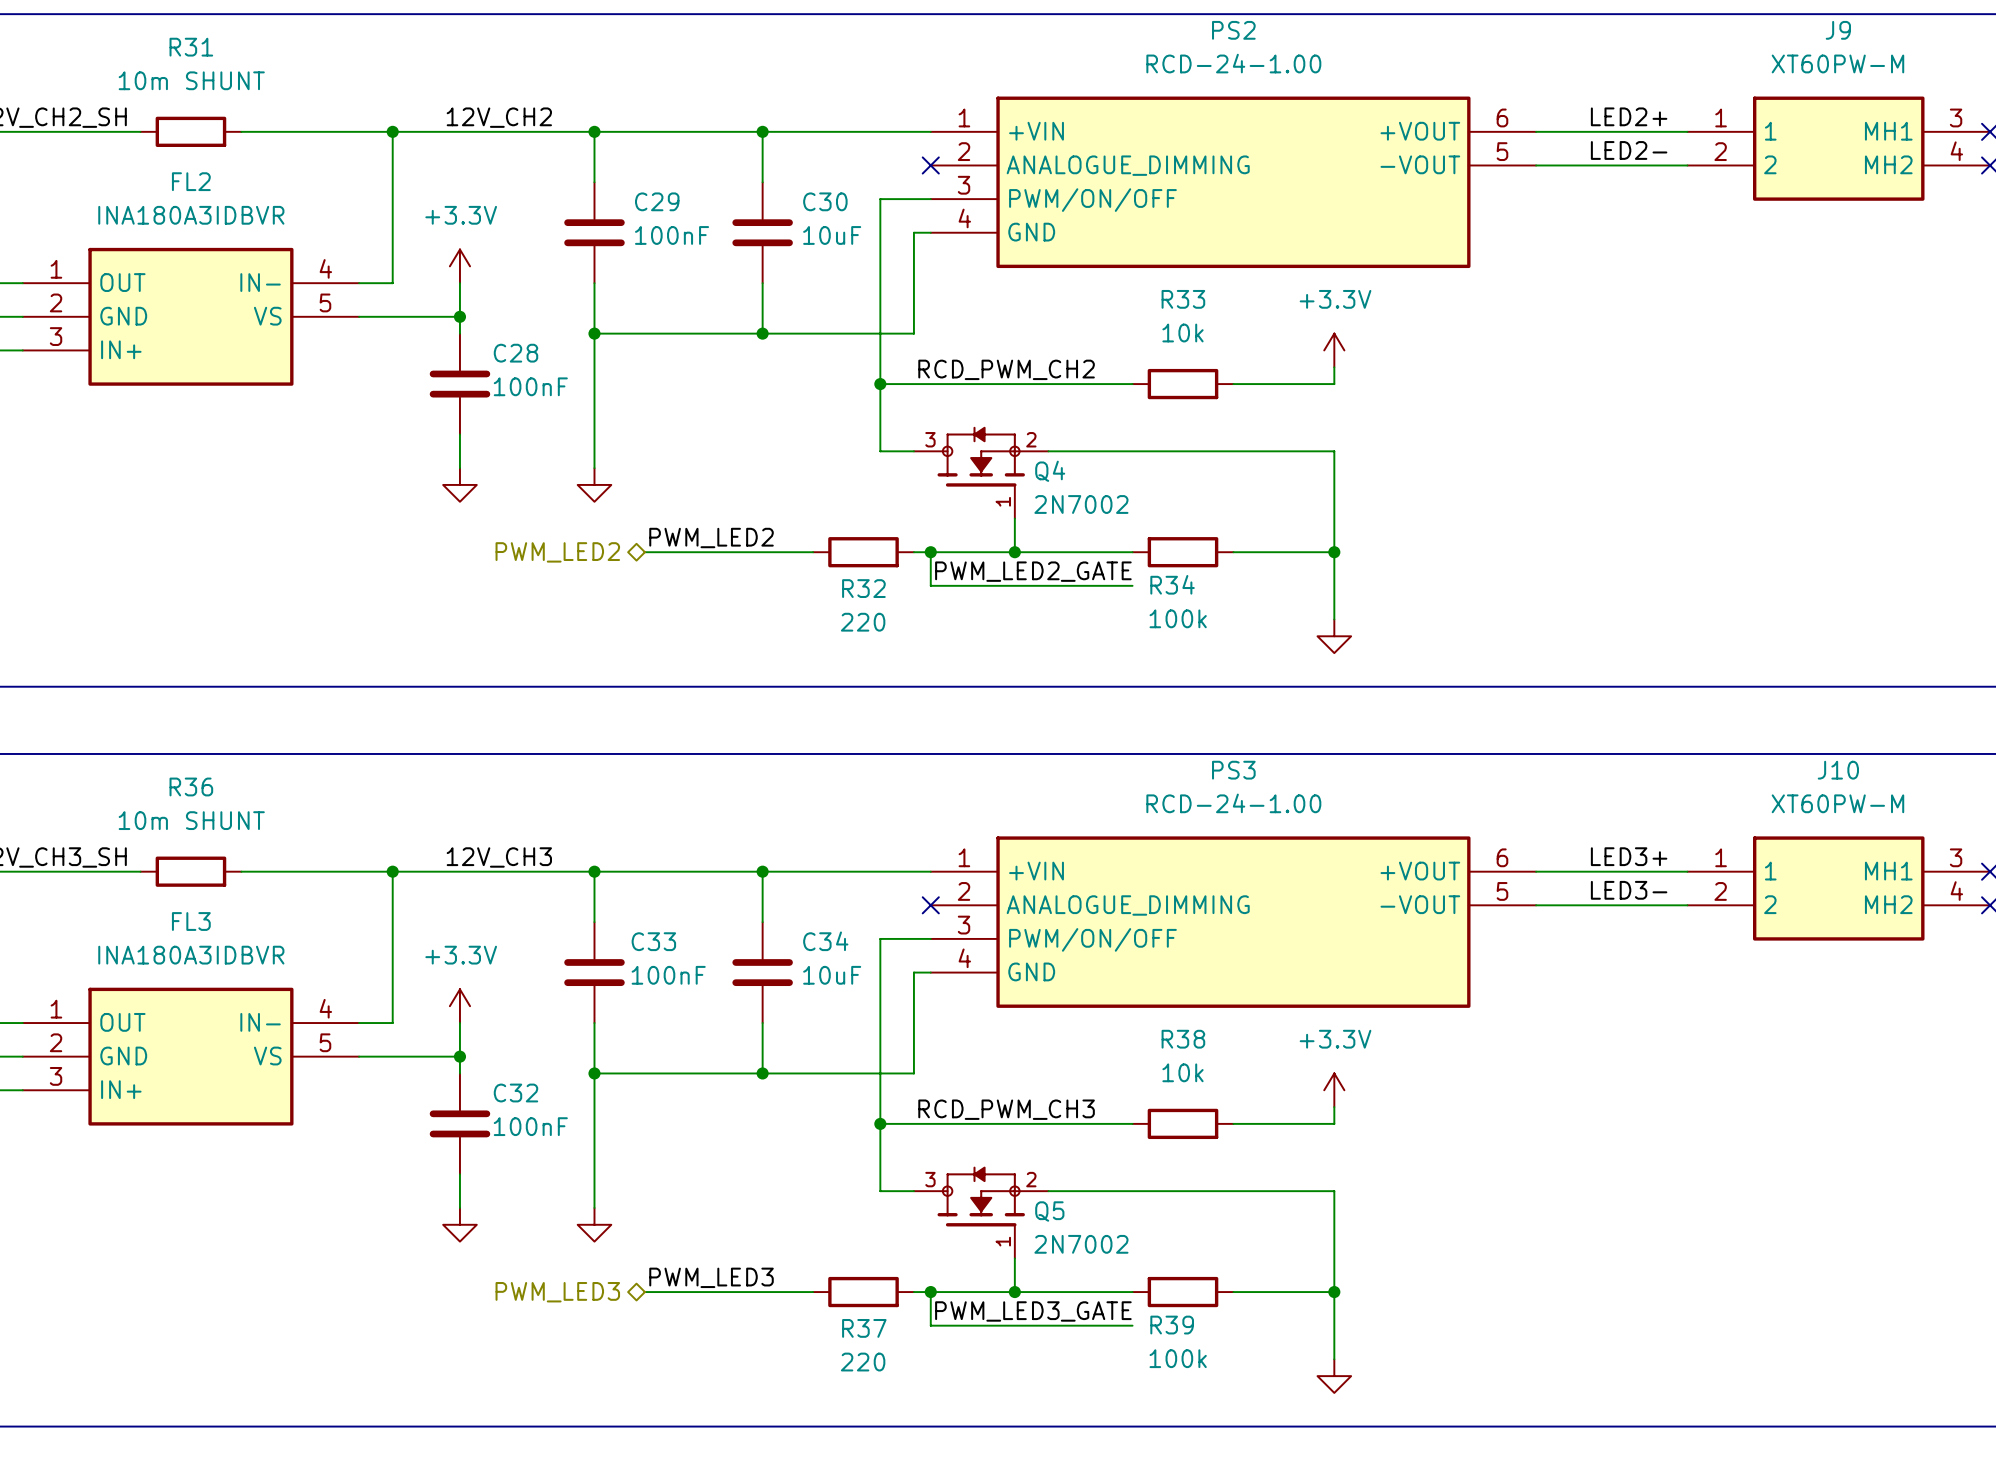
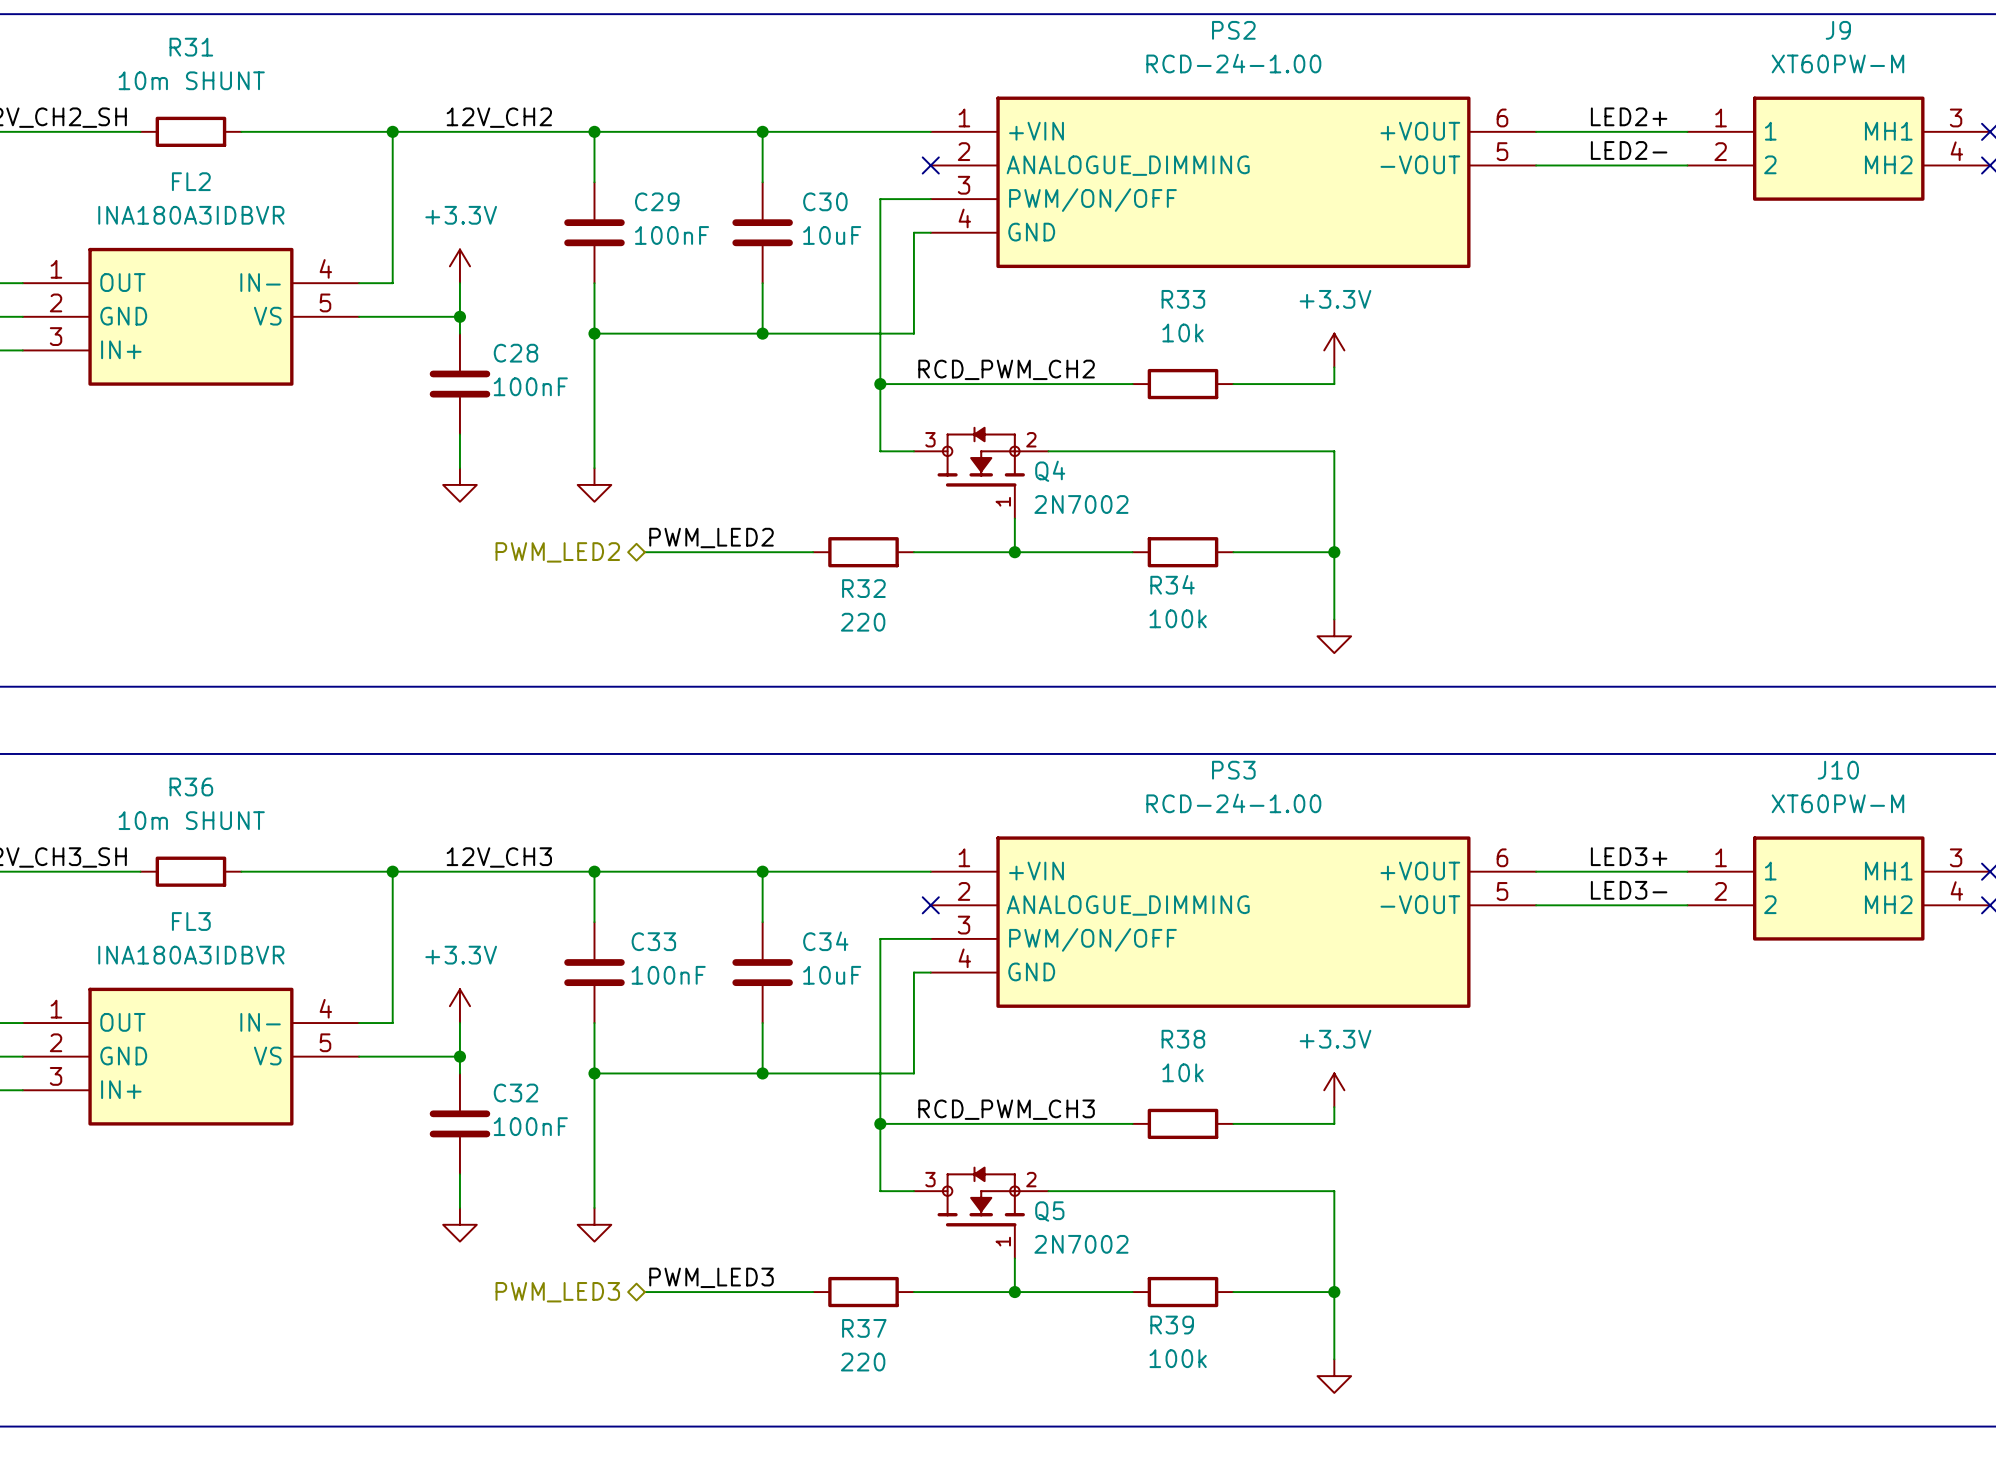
wire: (930, 552) (930, 585) (1132, 585) -> none
junction: (930, 552) -> none
label: PWM_LED2_GATE (1033, 571) -> none
wire: (930, 1292) (930, 1325) (1132, 1325) -> none
junction: (930, 1292) -> none
label: PWM_LED3_GATE (1033, 1311) -> none

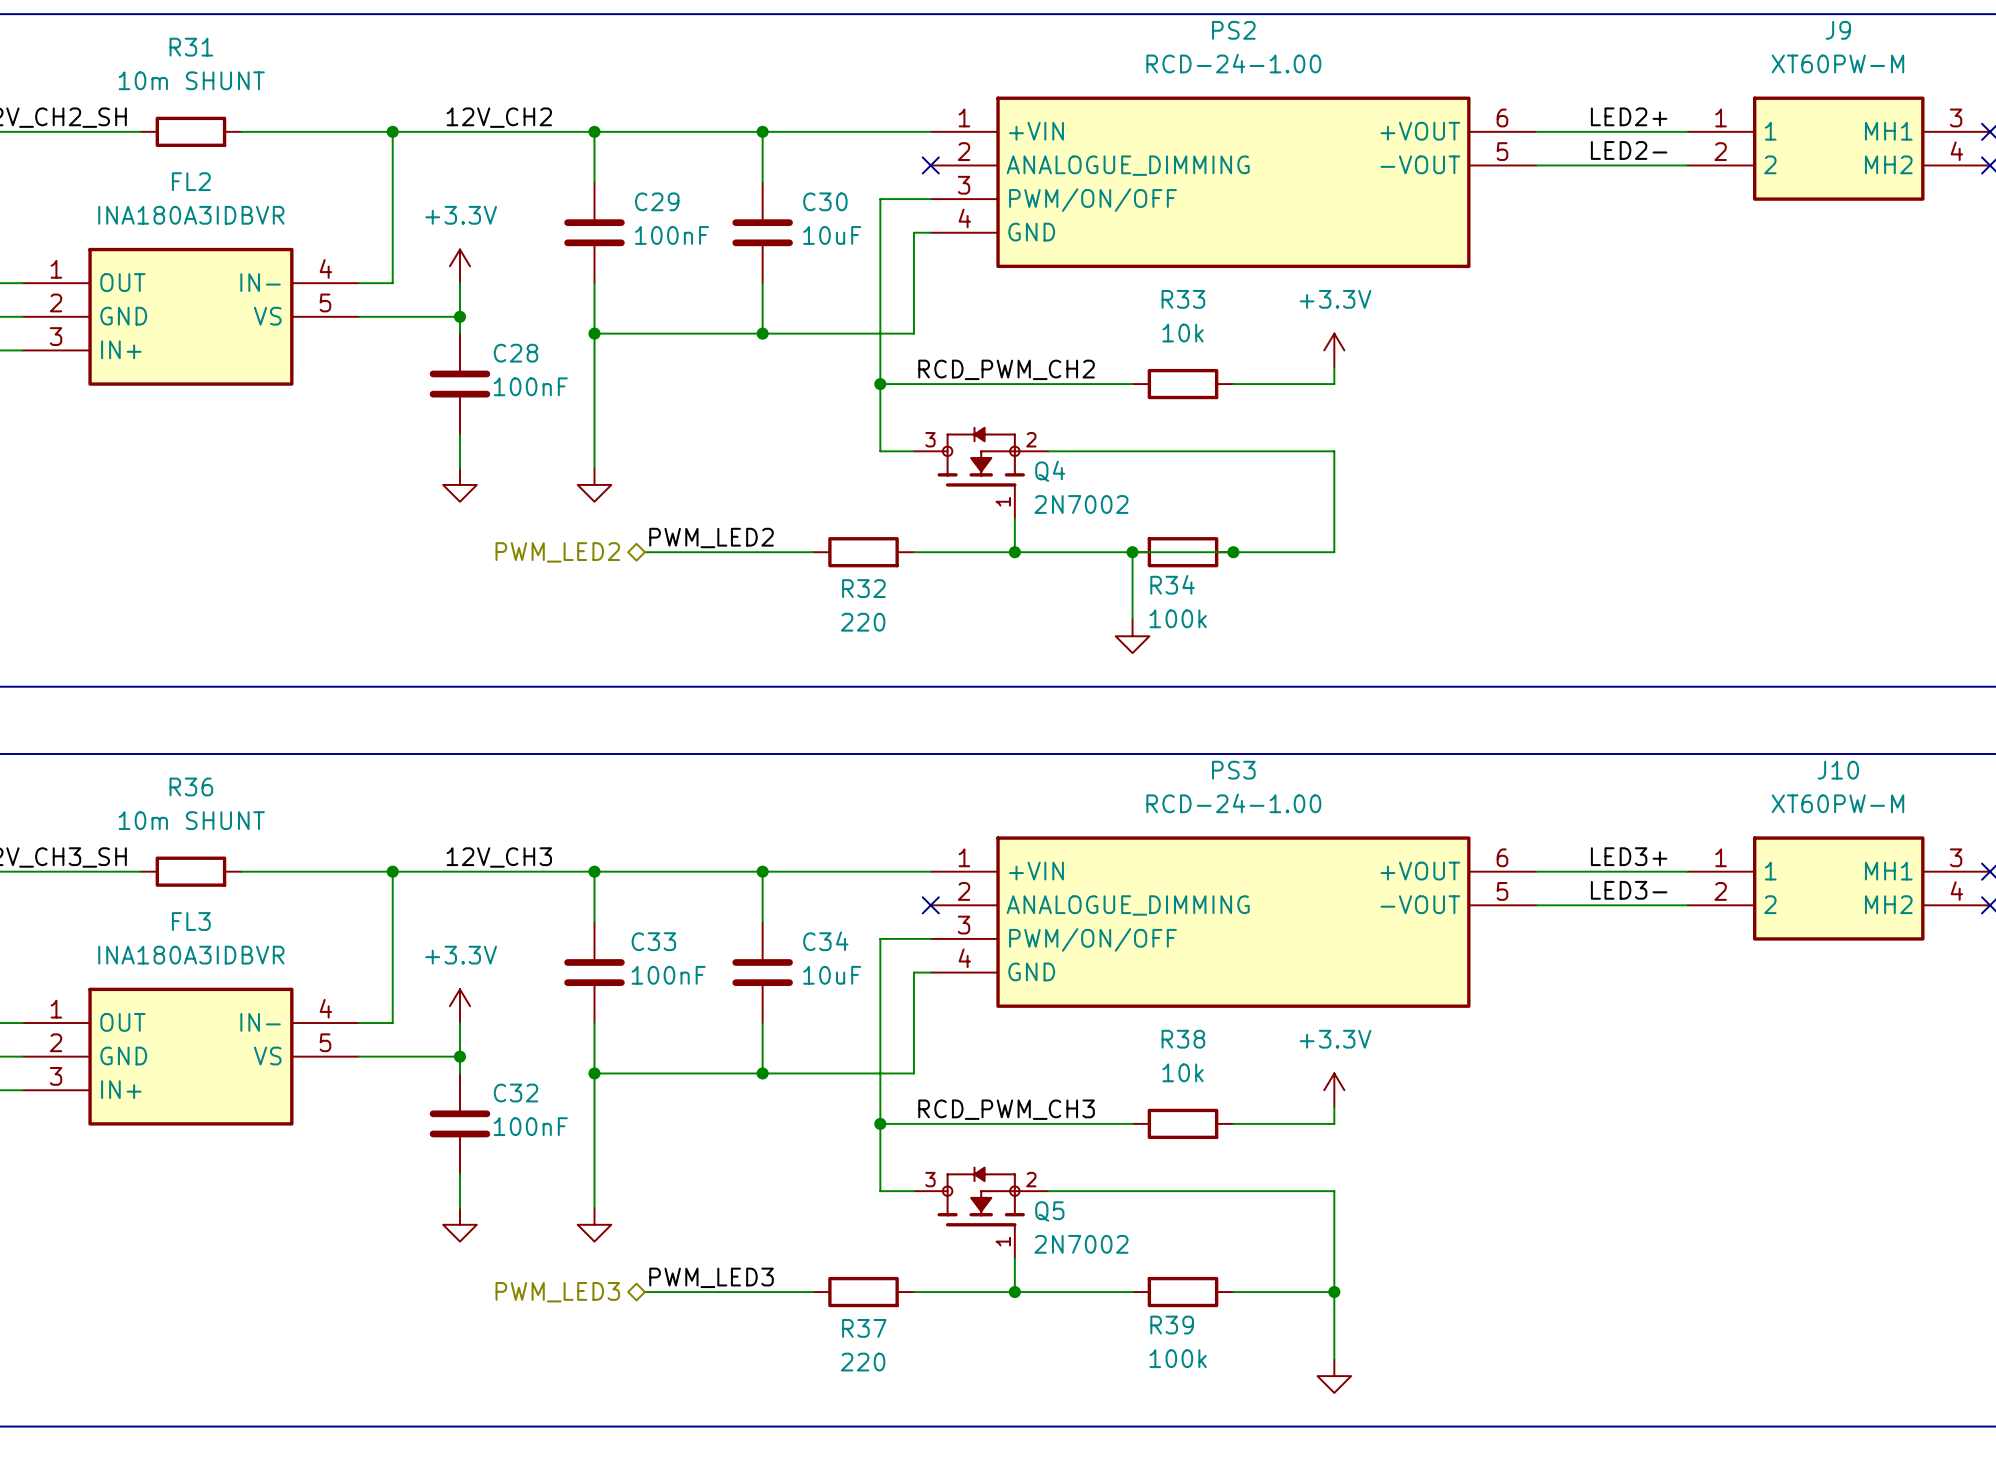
junction: none -> (1132, 552)
wire: none -> (1233, 552) (1132, 552) (1132, 619)
junction: none -> (1233, 552)
wire: (1334, 552) (1334, 619) -> none
junction: (1334, 552) -> none
power symbol position: (1334, 636) -> (1132, 636)

